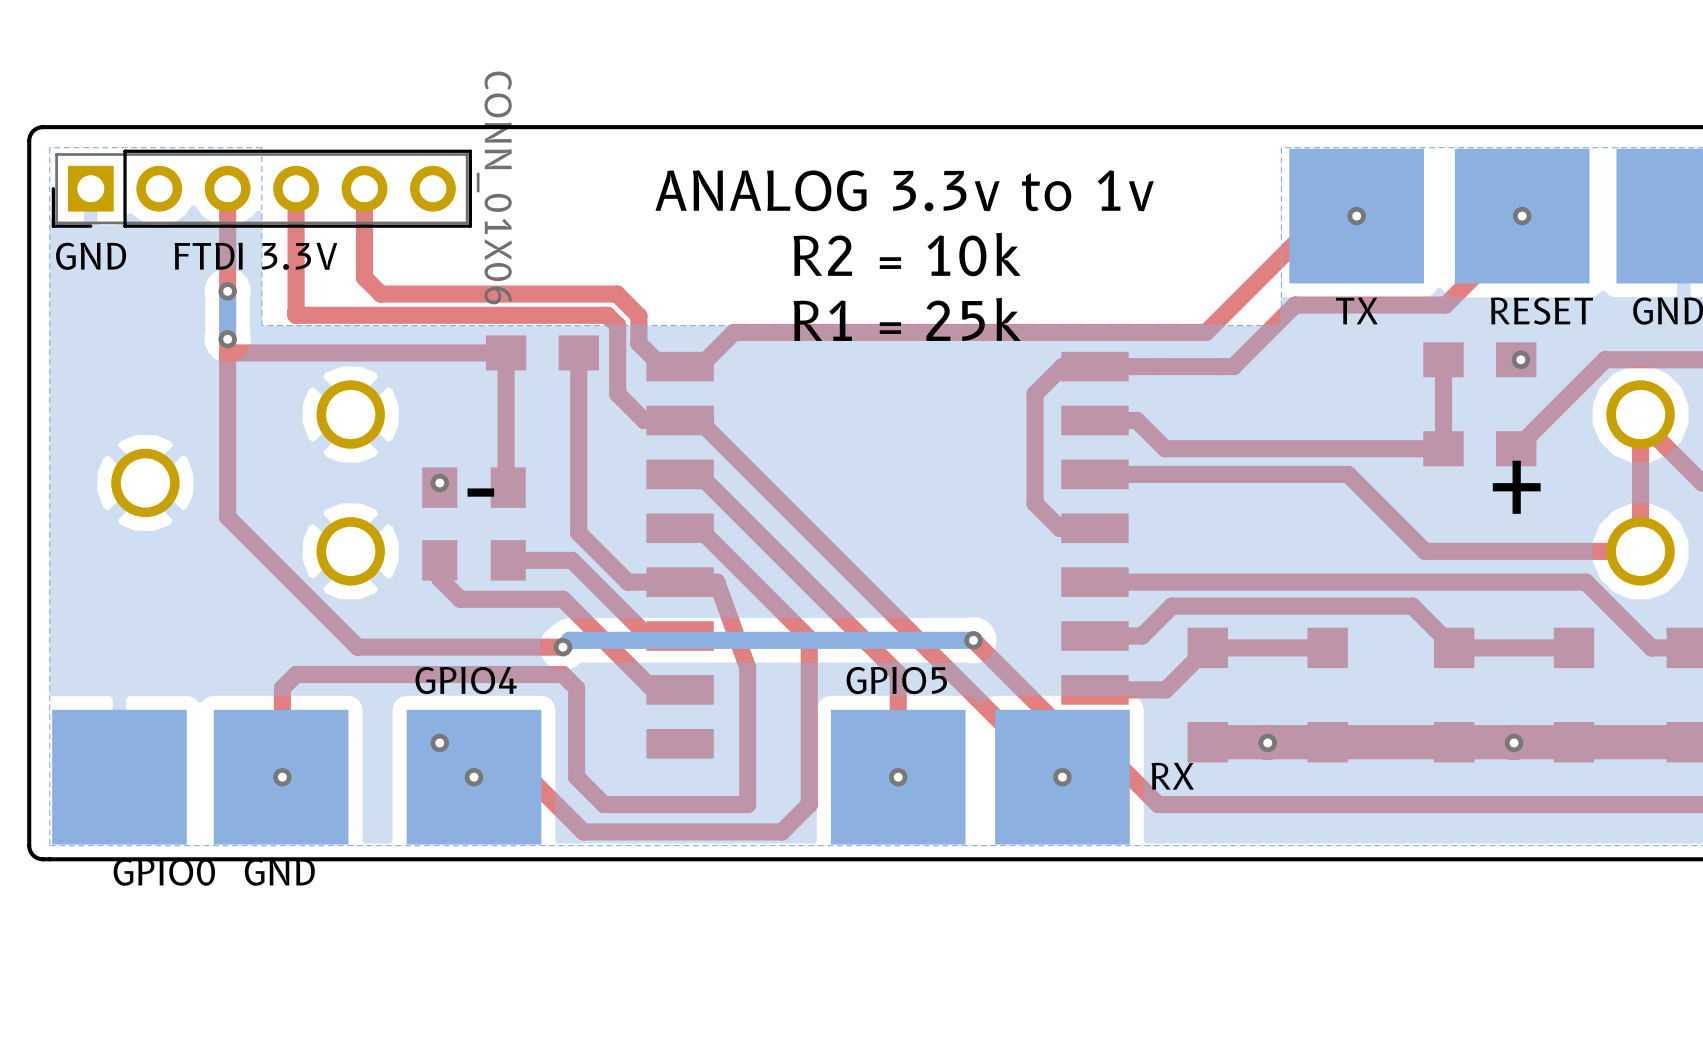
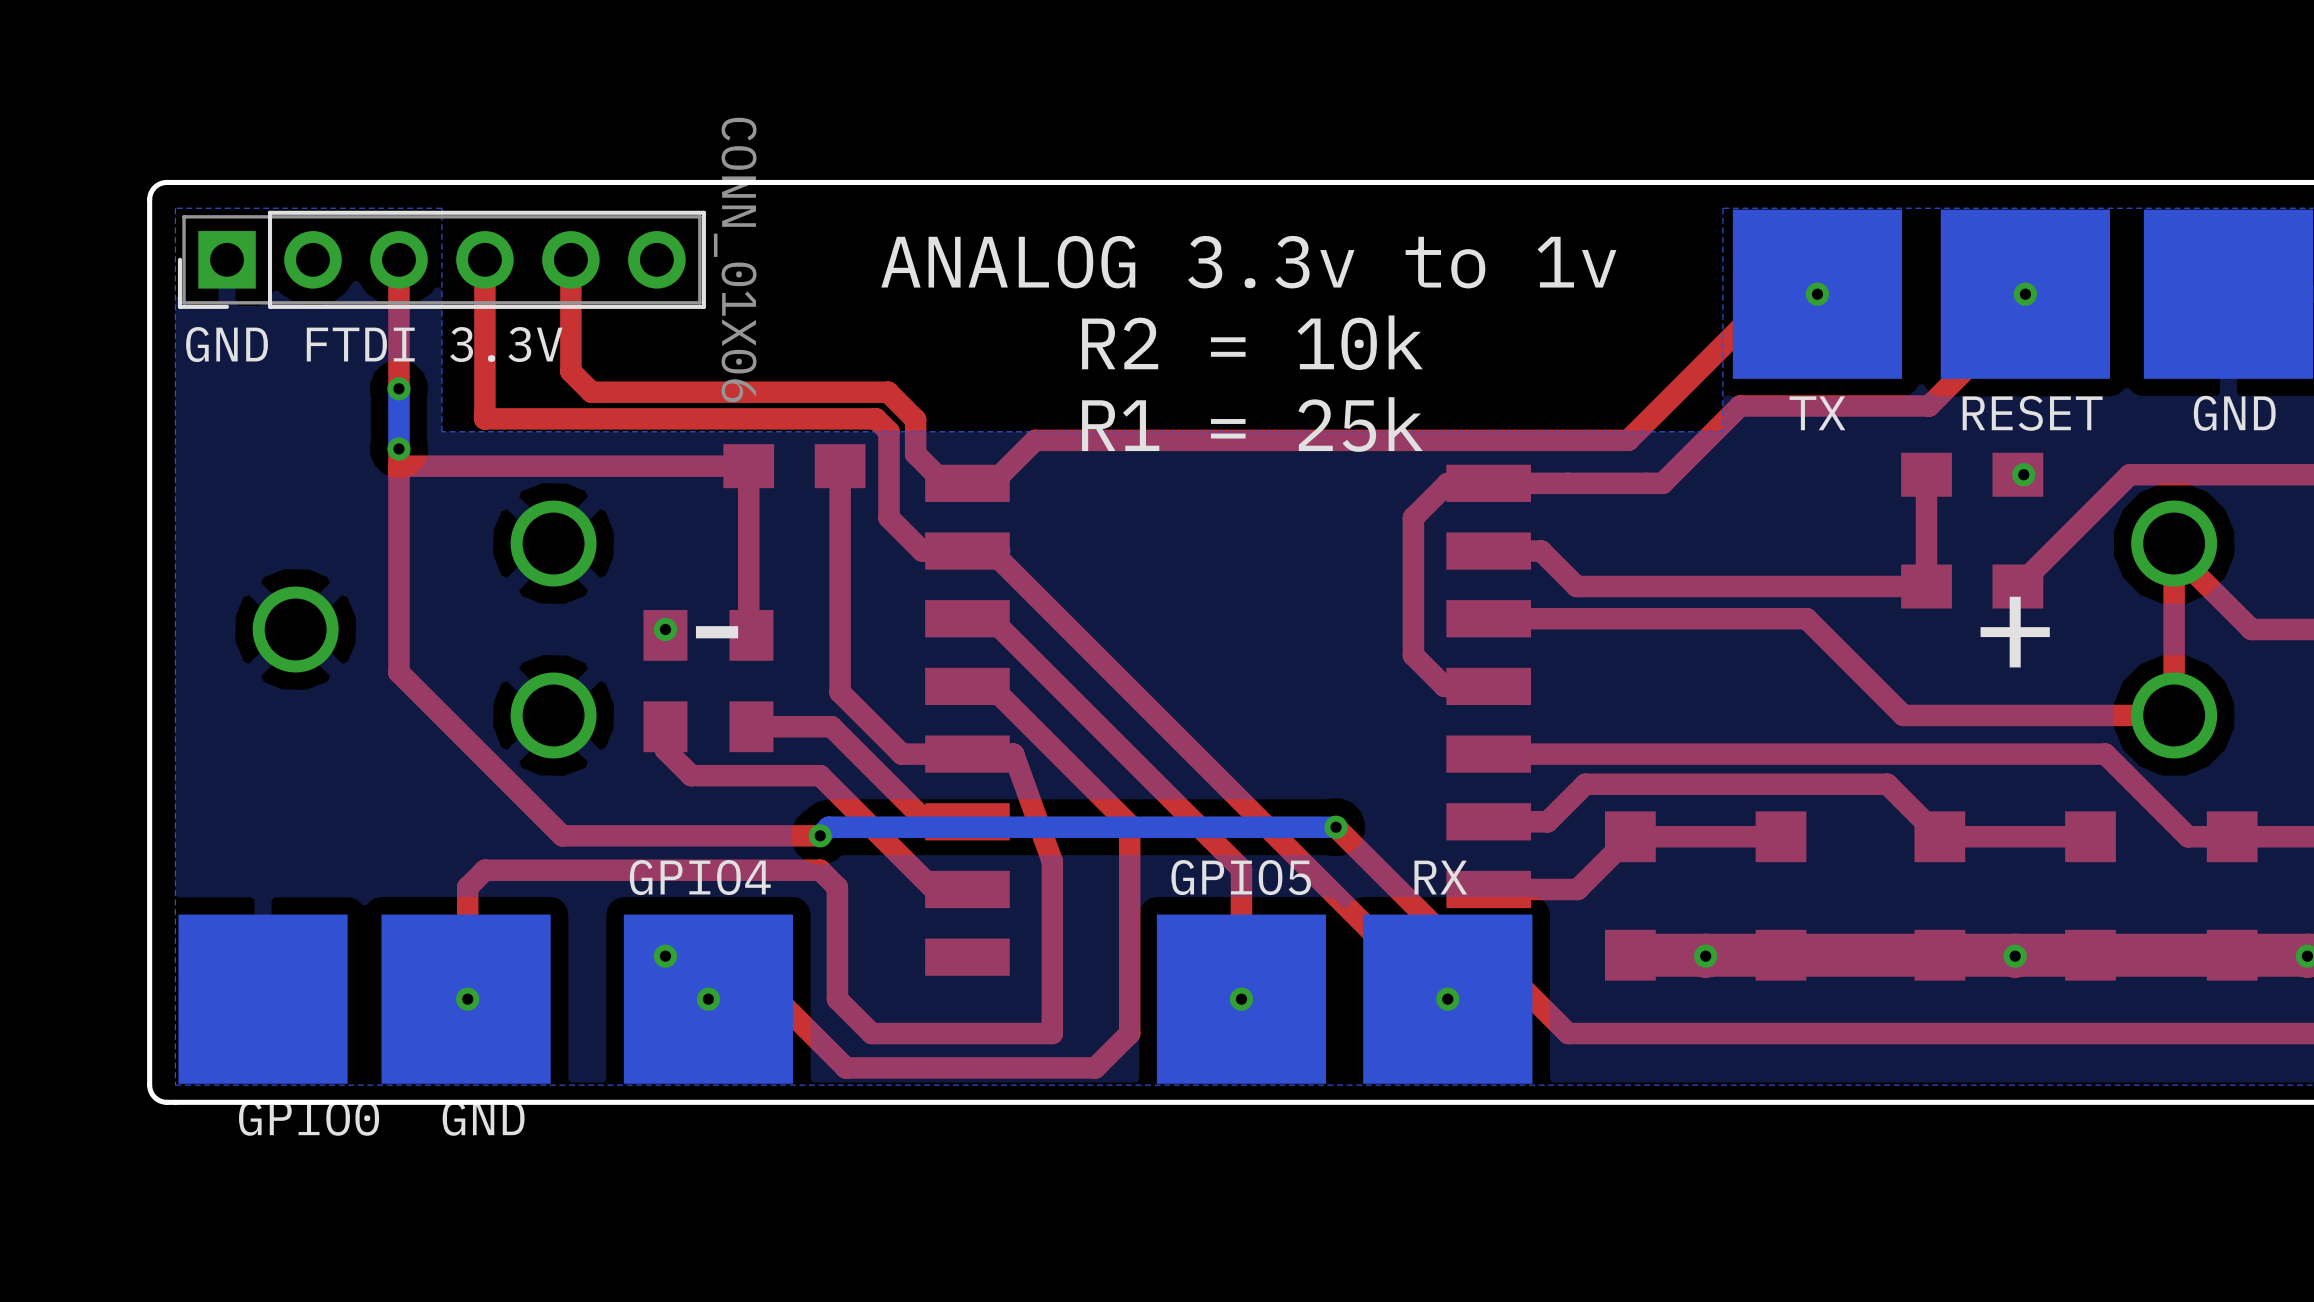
RX name position: RX (1172, 776) -> RX (1440, 877)

